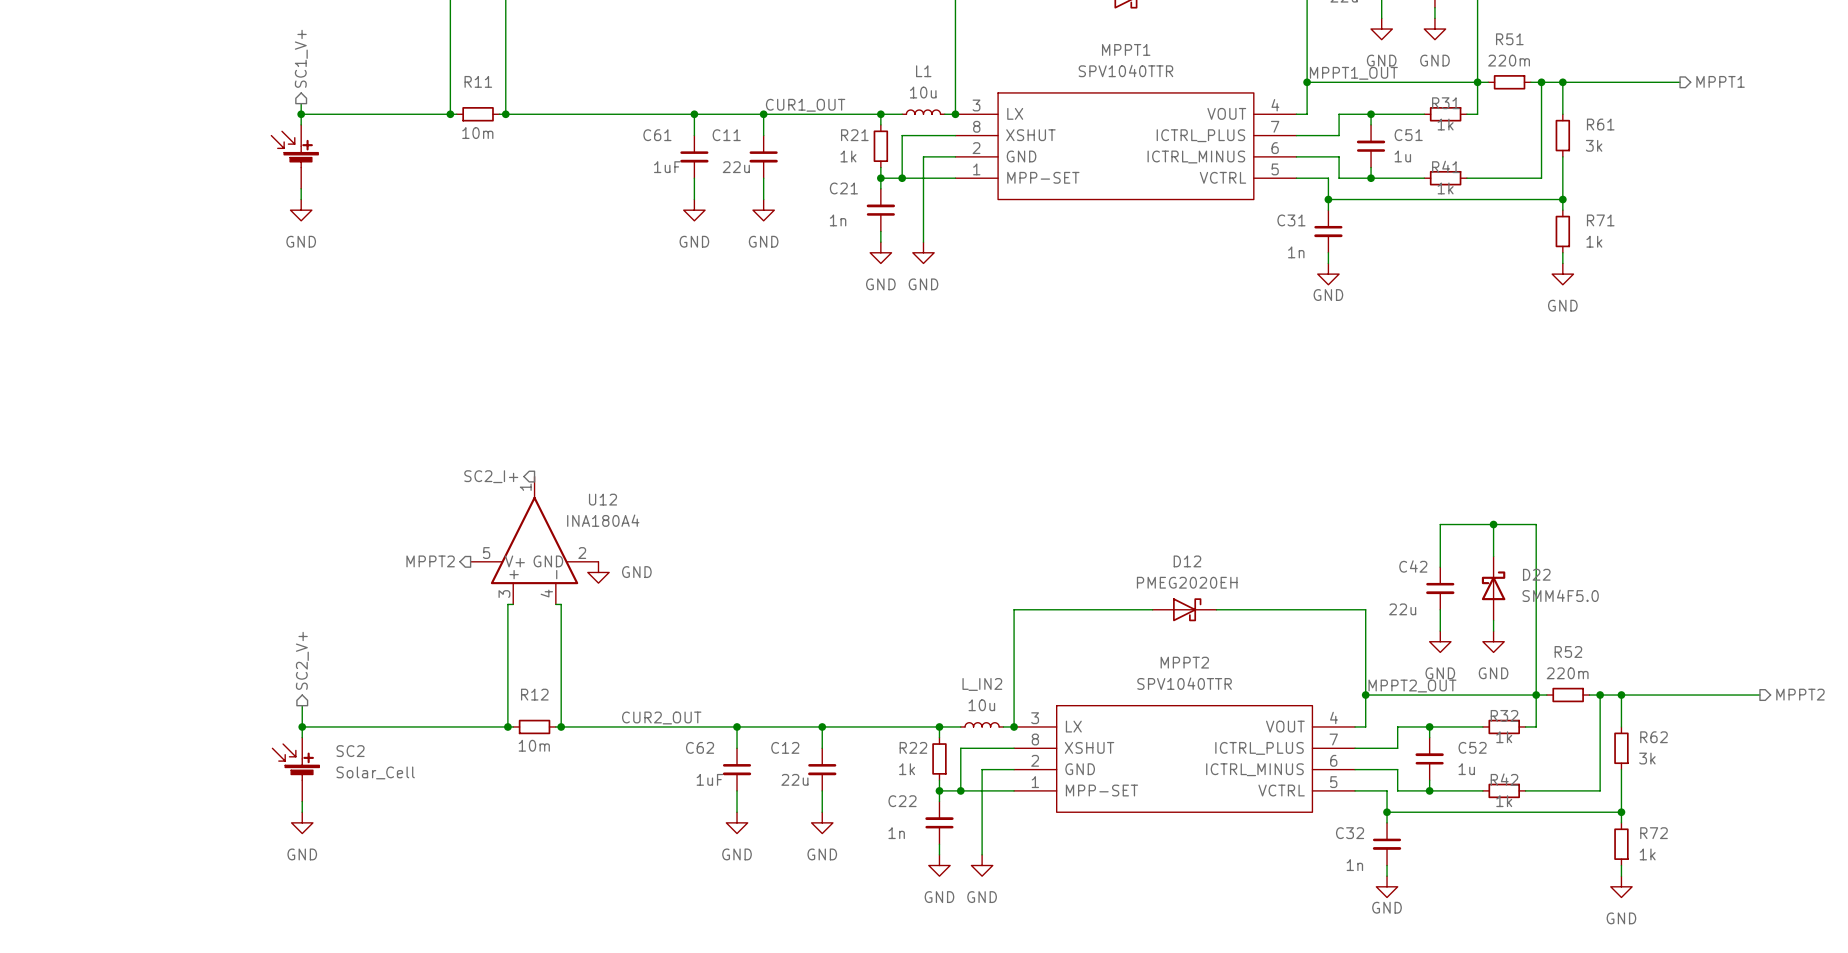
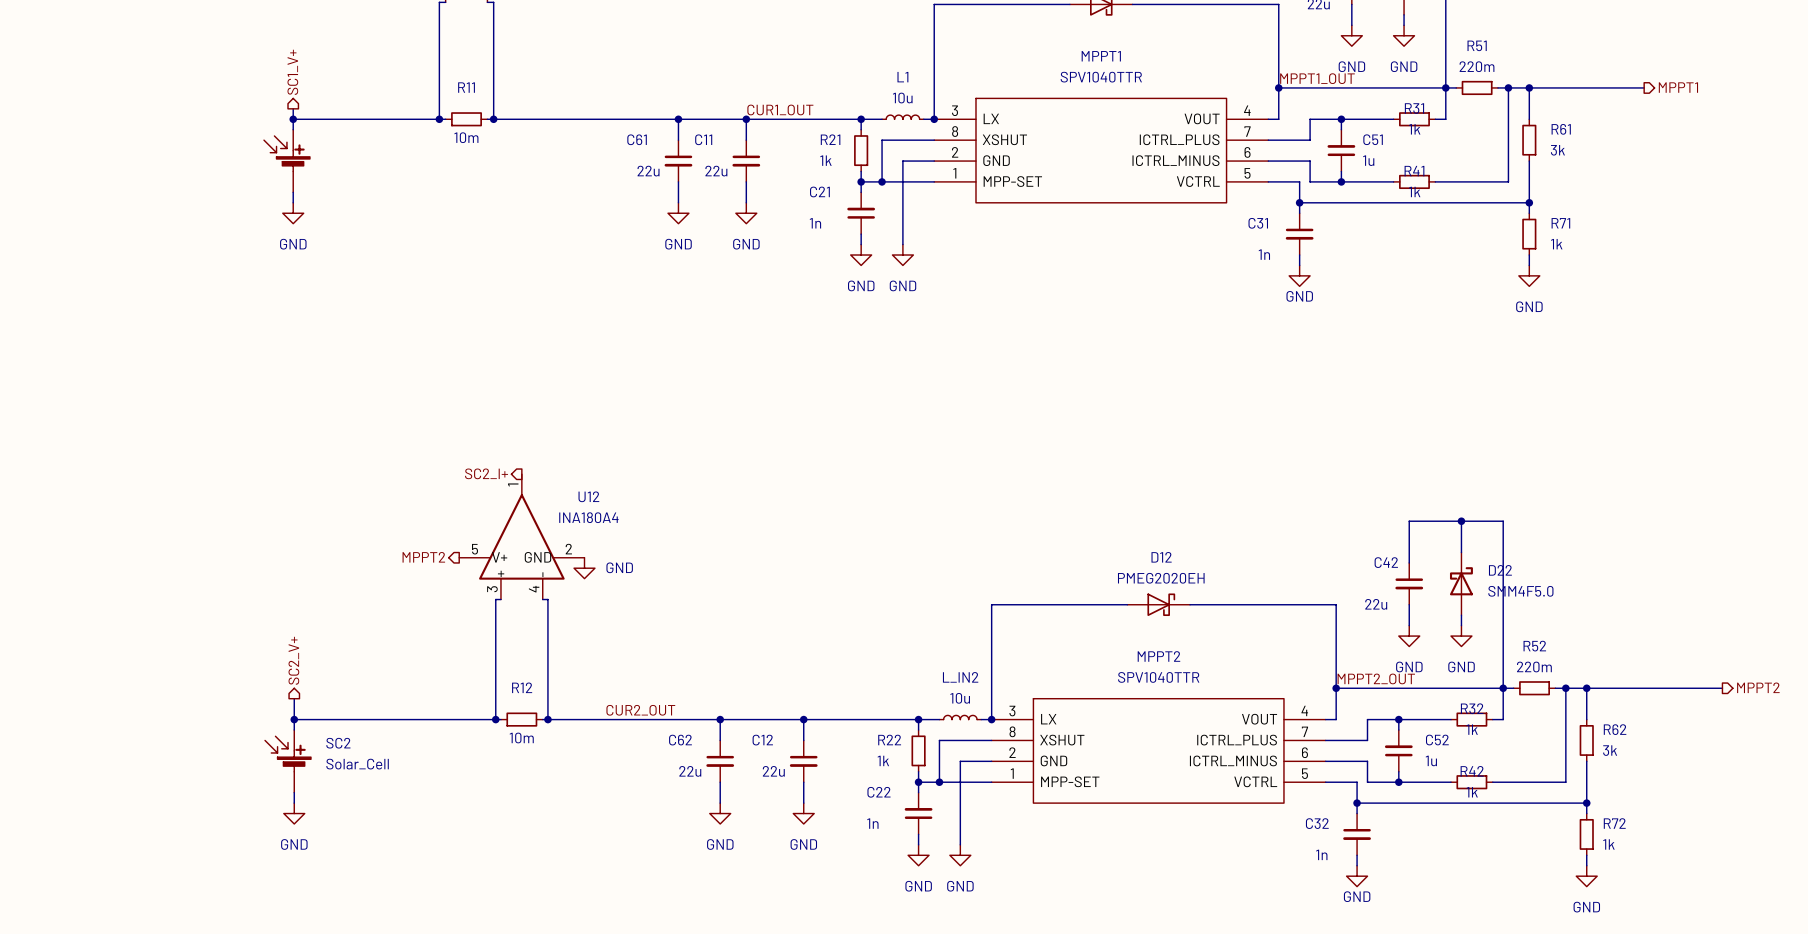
C61 value: 1uF (667, 167) -> 22u (648, 171)
C62 value: 1uF (709, 779) -> 22u (690, 771)

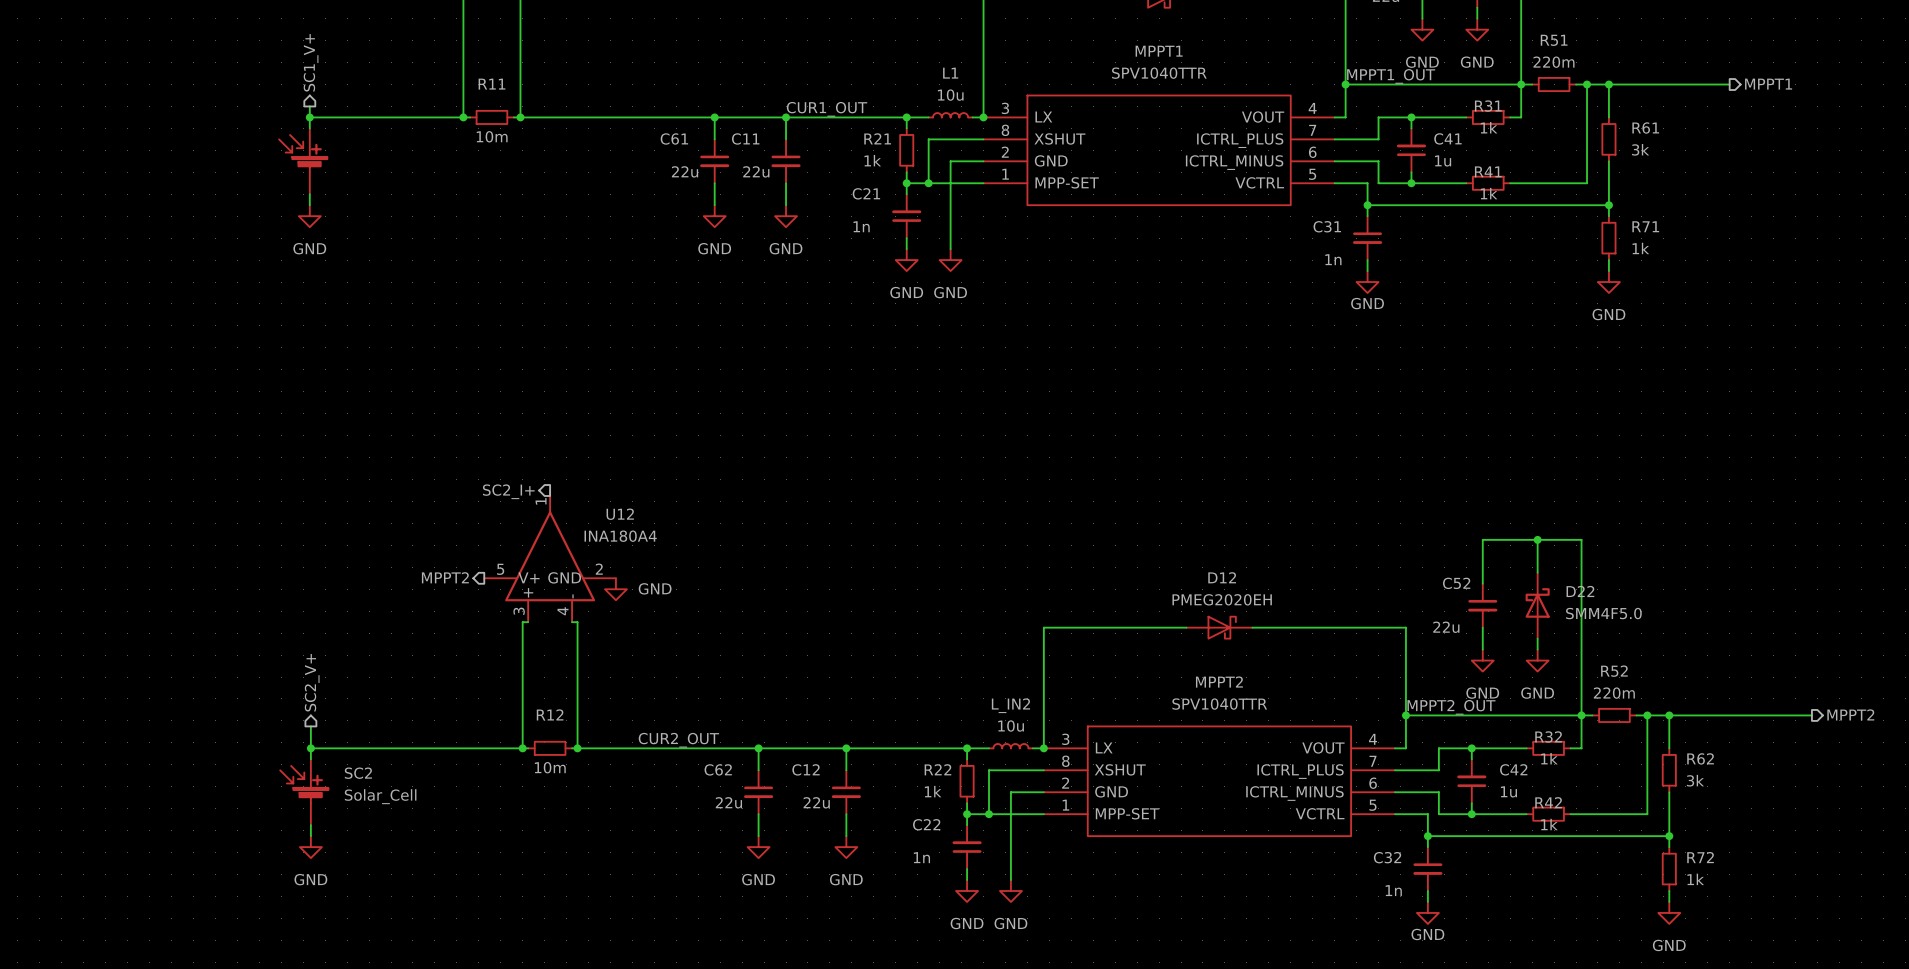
C51 name: C51 (1373, 139) -> C41 (1447, 138)
C42 name: C42 (1386, 562) -> C52 (1456, 583)
C52 name: C52 (1437, 740) -> C42 (1513, 769)

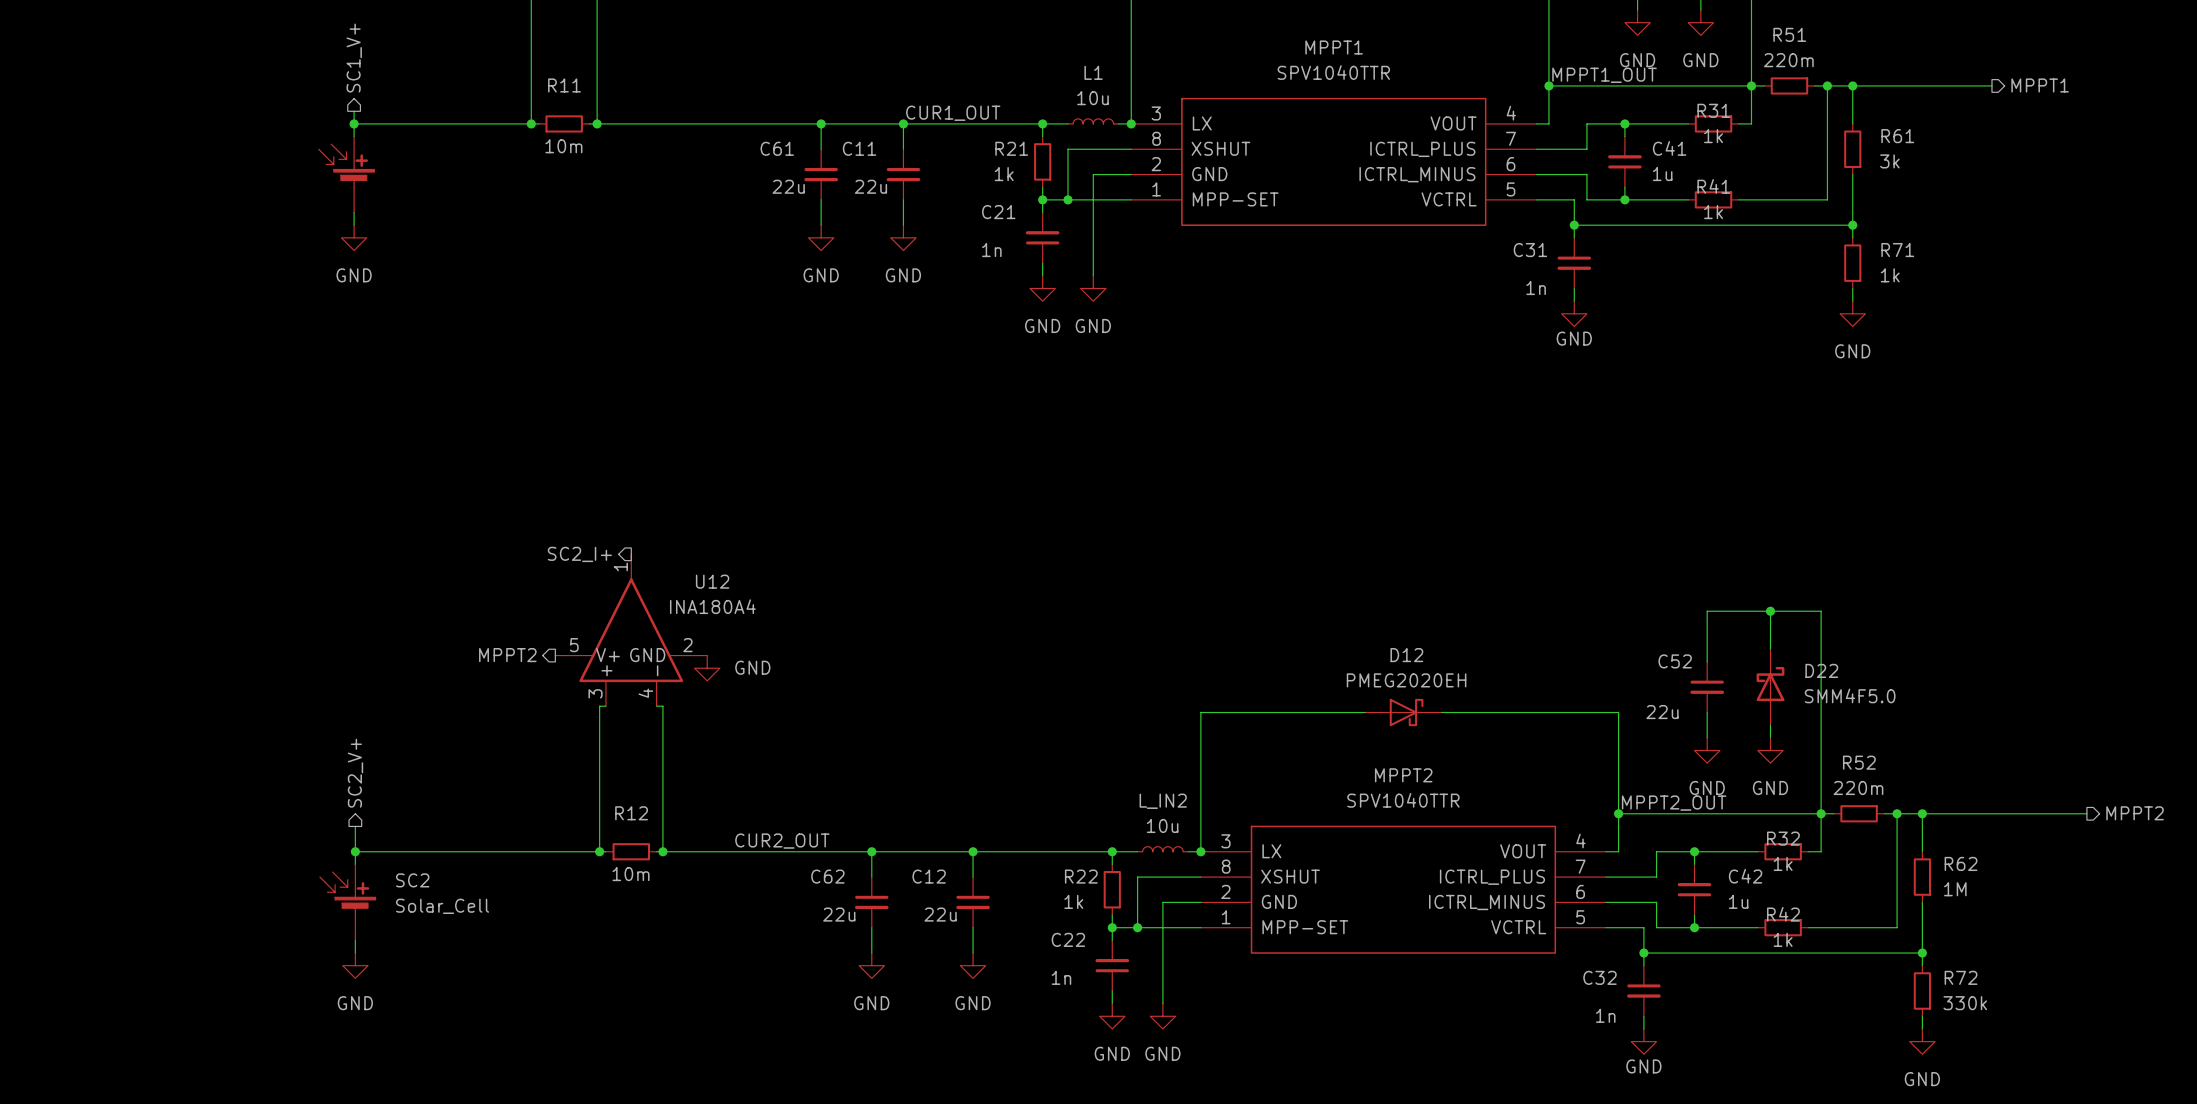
R62 value: 3k (1695, 780) -> 1M (1955, 889)
R72 value: 1k (1695, 879) -> 330k (1965, 1003)

